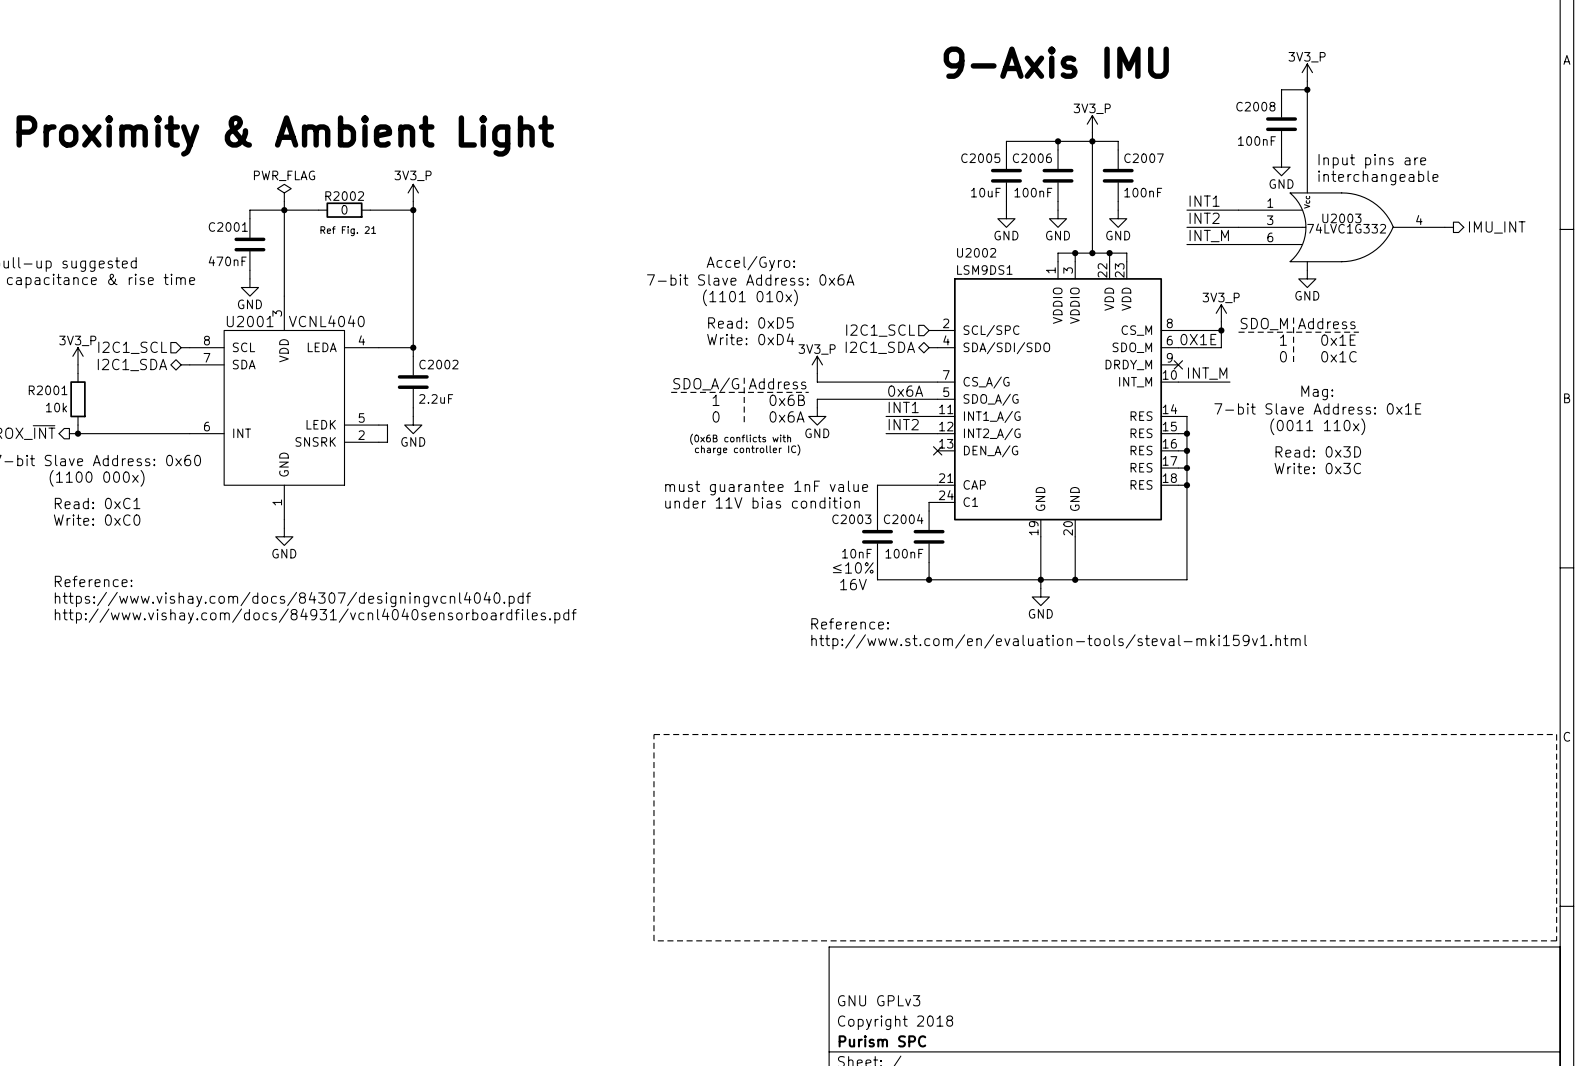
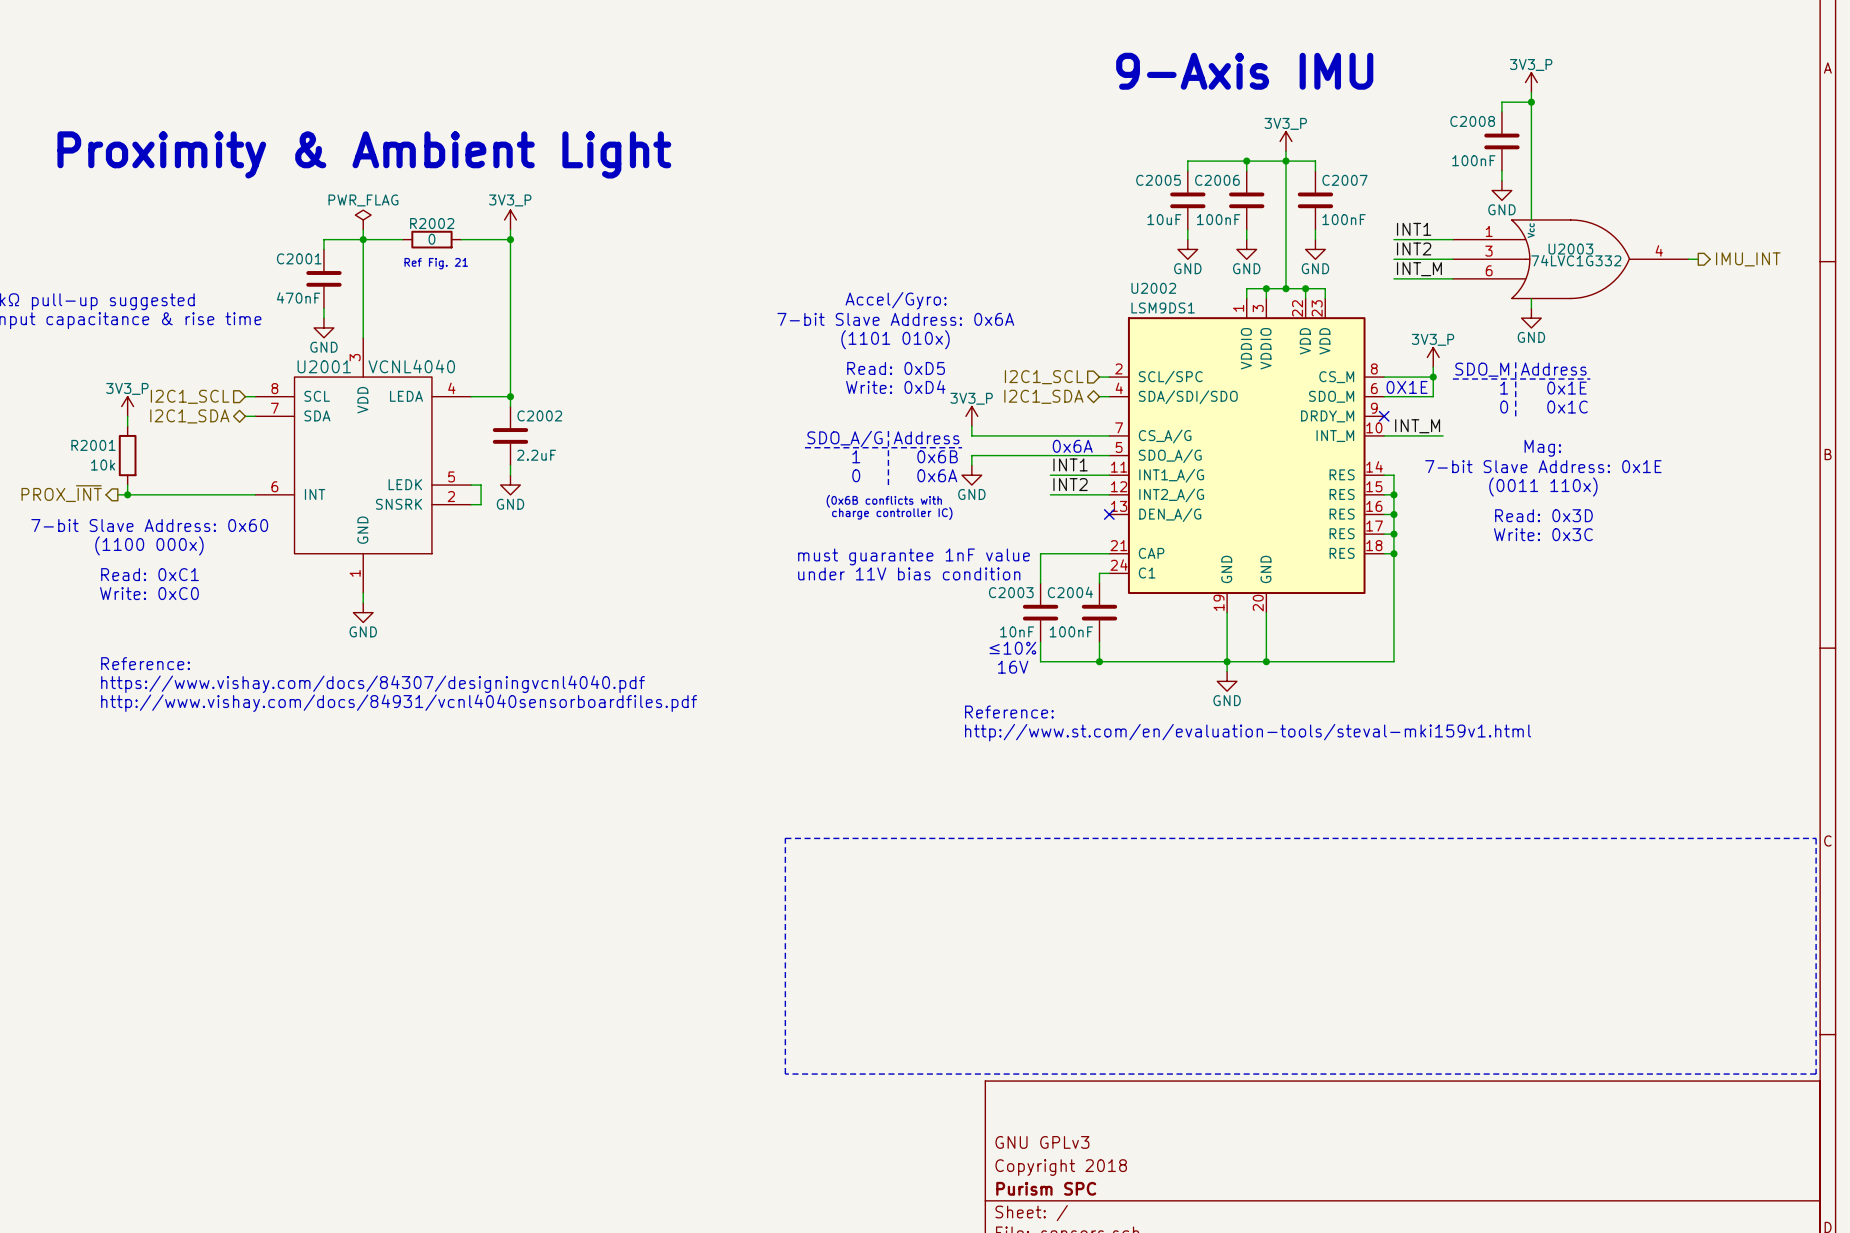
text: Input pins are (1372, 161) -> none
text: interchangeable (1378, 177) -> none

